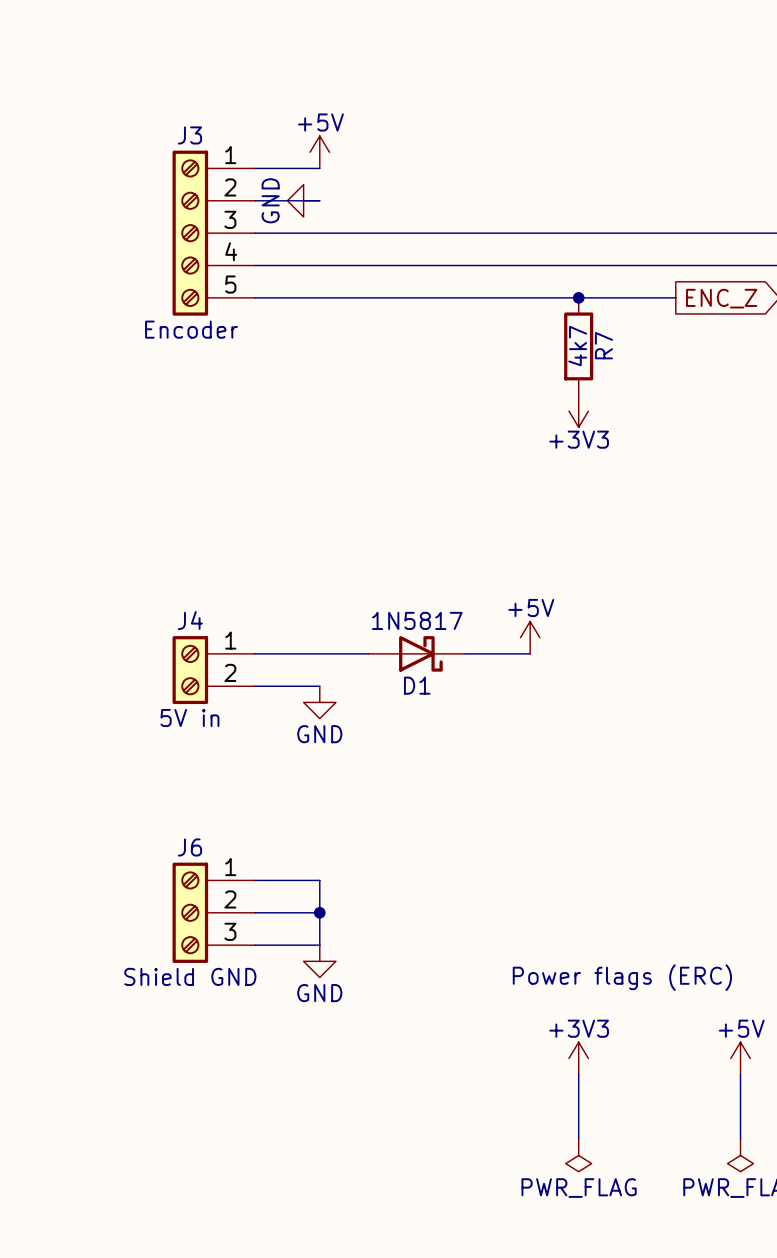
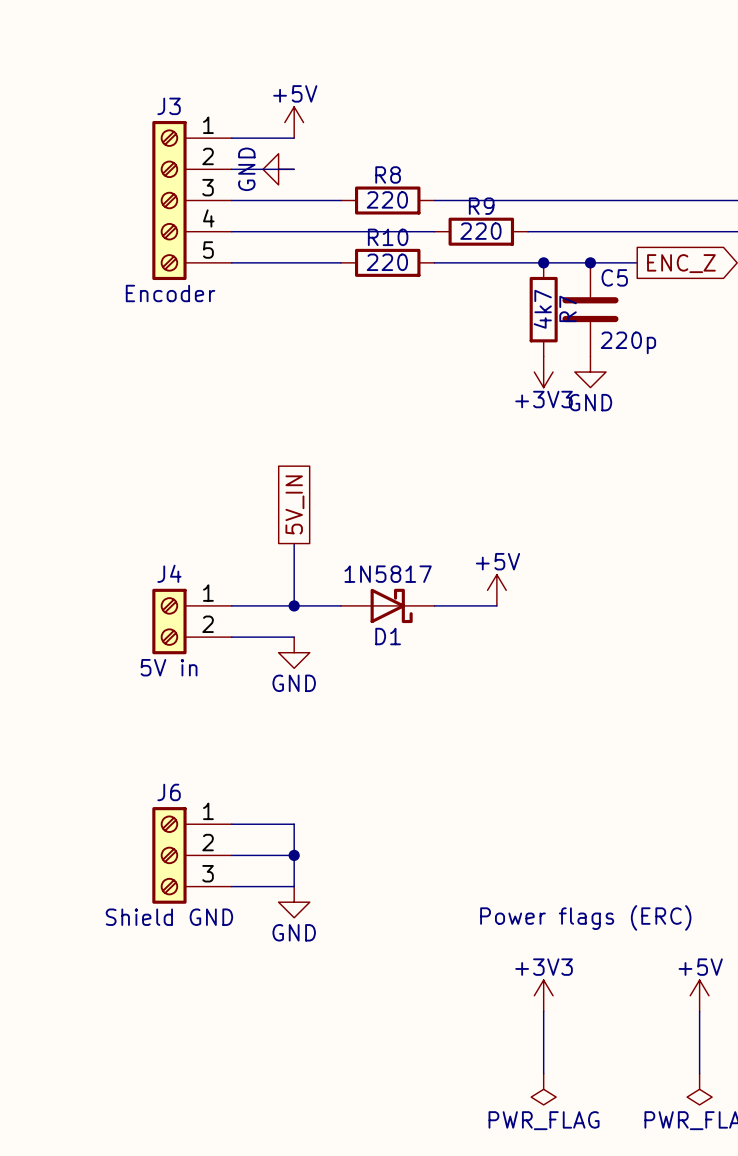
wire: (368, 233) (465, 233) -> none
R8: none -> 220 (387, 200)
wire: (465, 265) (562, 265) -> none
R9: none -> 220 (481, 231)
wire: (368, 297) (465, 297) -> none
R10: none -> 220 (387, 262)
junction: none -> (590, 262)
C5: none -> 220p (590, 309)
power symbol: none -> GND (590, 372)
global label: none -> 5V_IN (294, 504)
wire: none -> (294, 543) (294, 605)
junction: none -> (294, 605)

